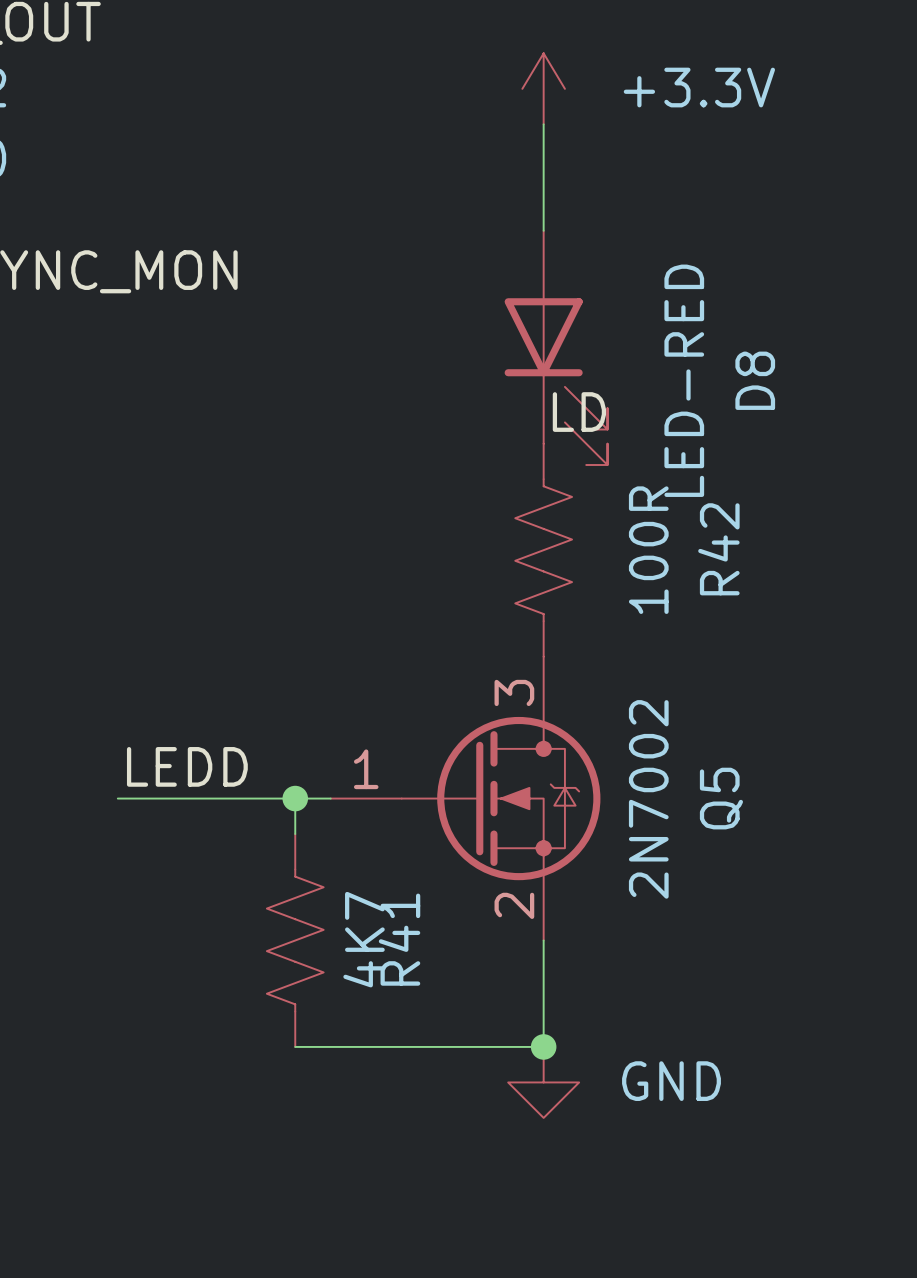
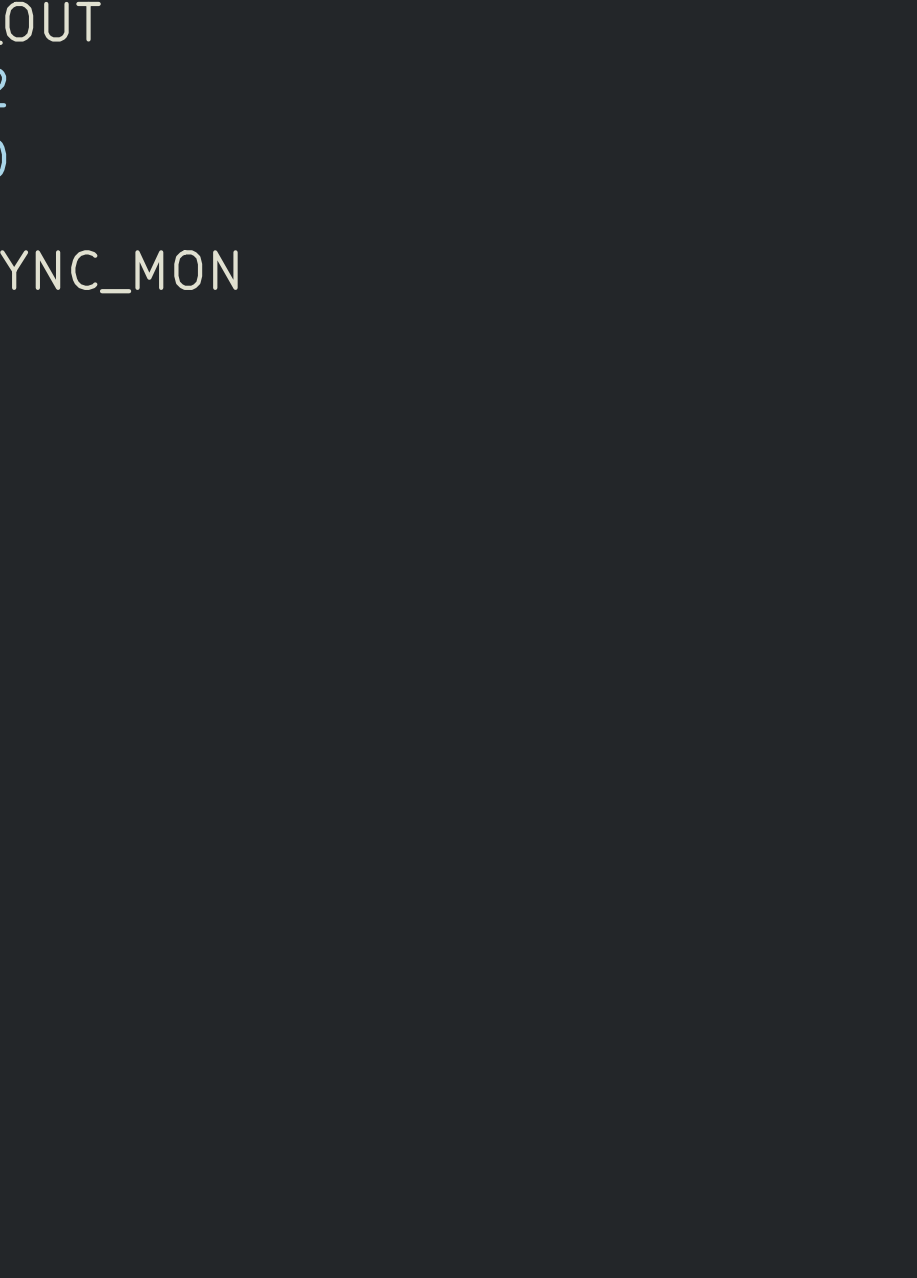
power symbol: +3.3V (543, 88) -> none
wire: (543, 124) (543, 230) -> none
D8: LED-RED (556, 347) -> none
label: LD (579, 412) -> none
R42: 100R (543, 550) -> none
label: LEDD (187, 766) -> none
wire: (117, 798) (330, 798) -> none
wire: (295, 798) (295, 834) -> none
junction: (295, 798) -> none
Q5: 2N7002 (465, 798) -> none
R41: 4K7 (295, 940) -> none
wire: (543, 940) (543, 1046) (295, 1046) -> none
junction: (543, 1046) -> none
power symbol: GND (543, 1082) -> none

